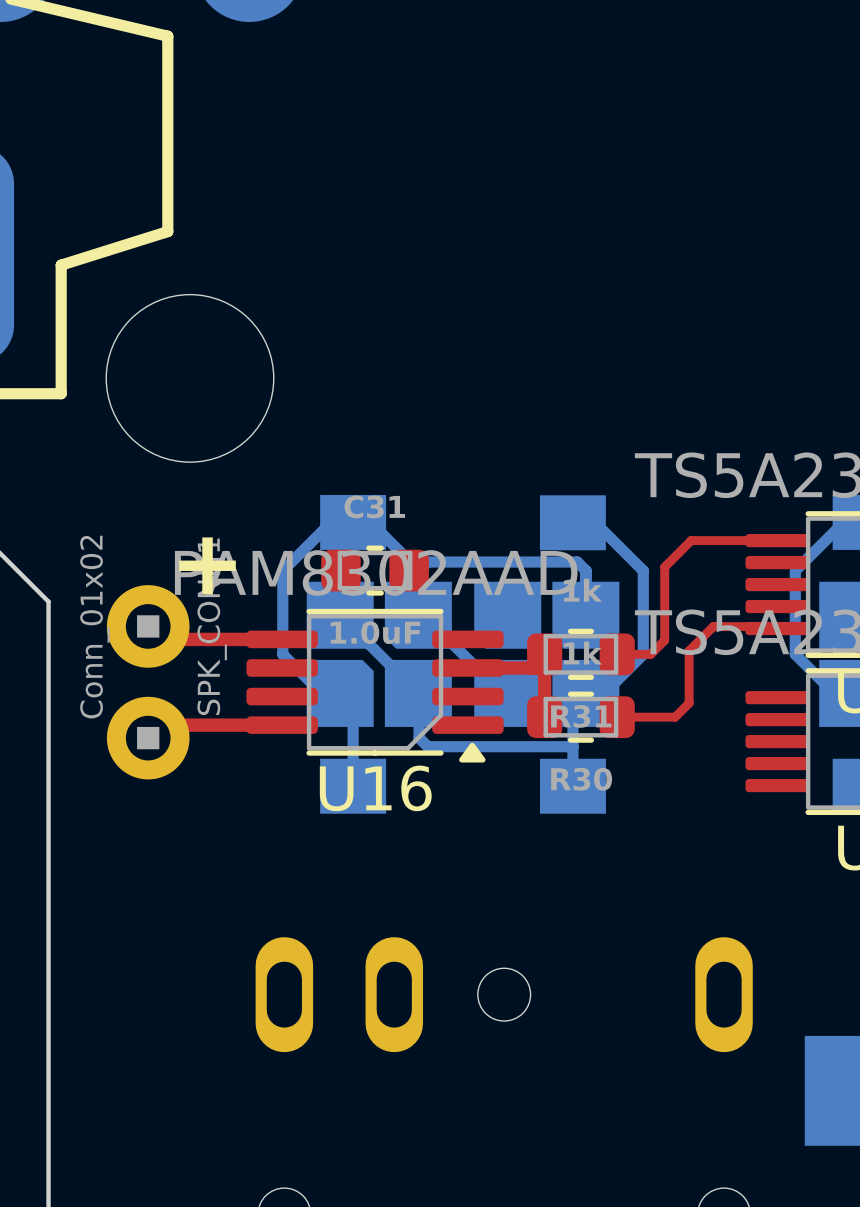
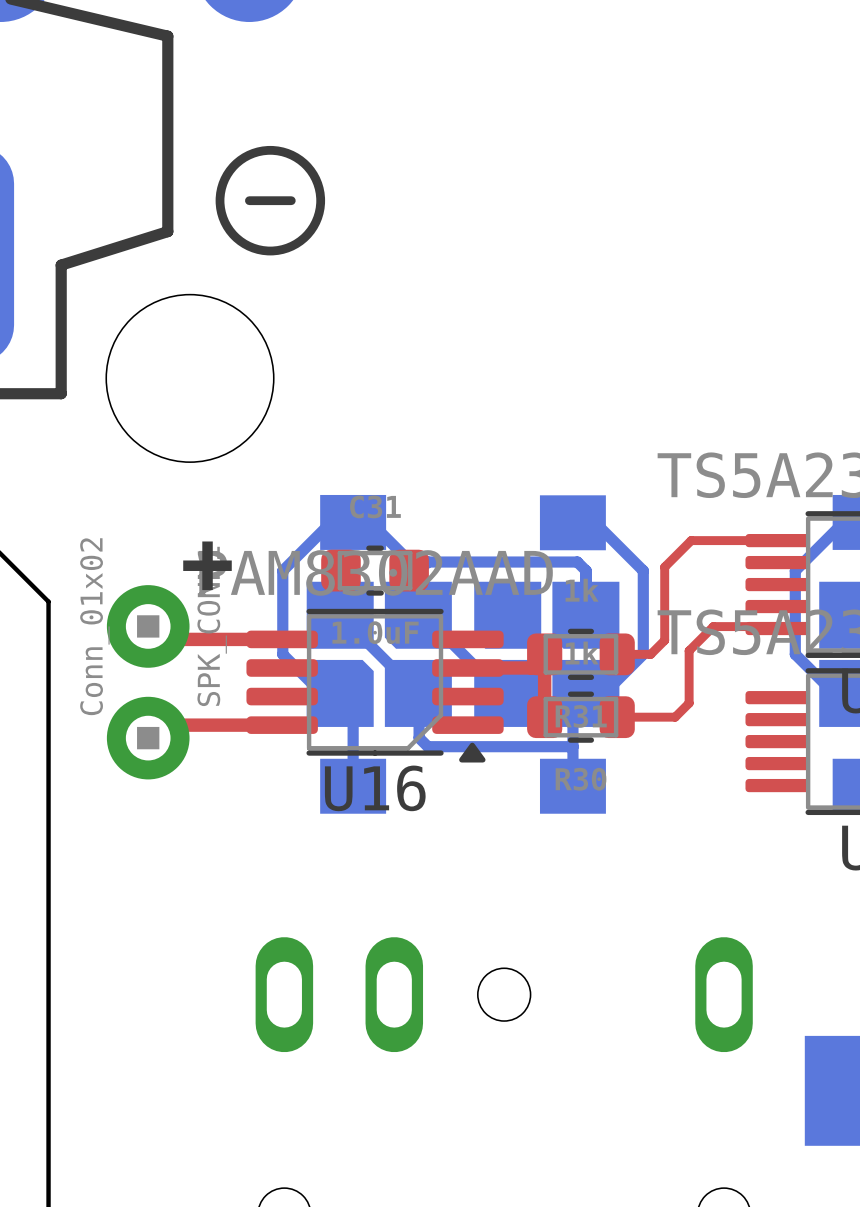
drawing: none -> [215, 145, 326, 256]
line: none -> (249, 200) (291, 200)

